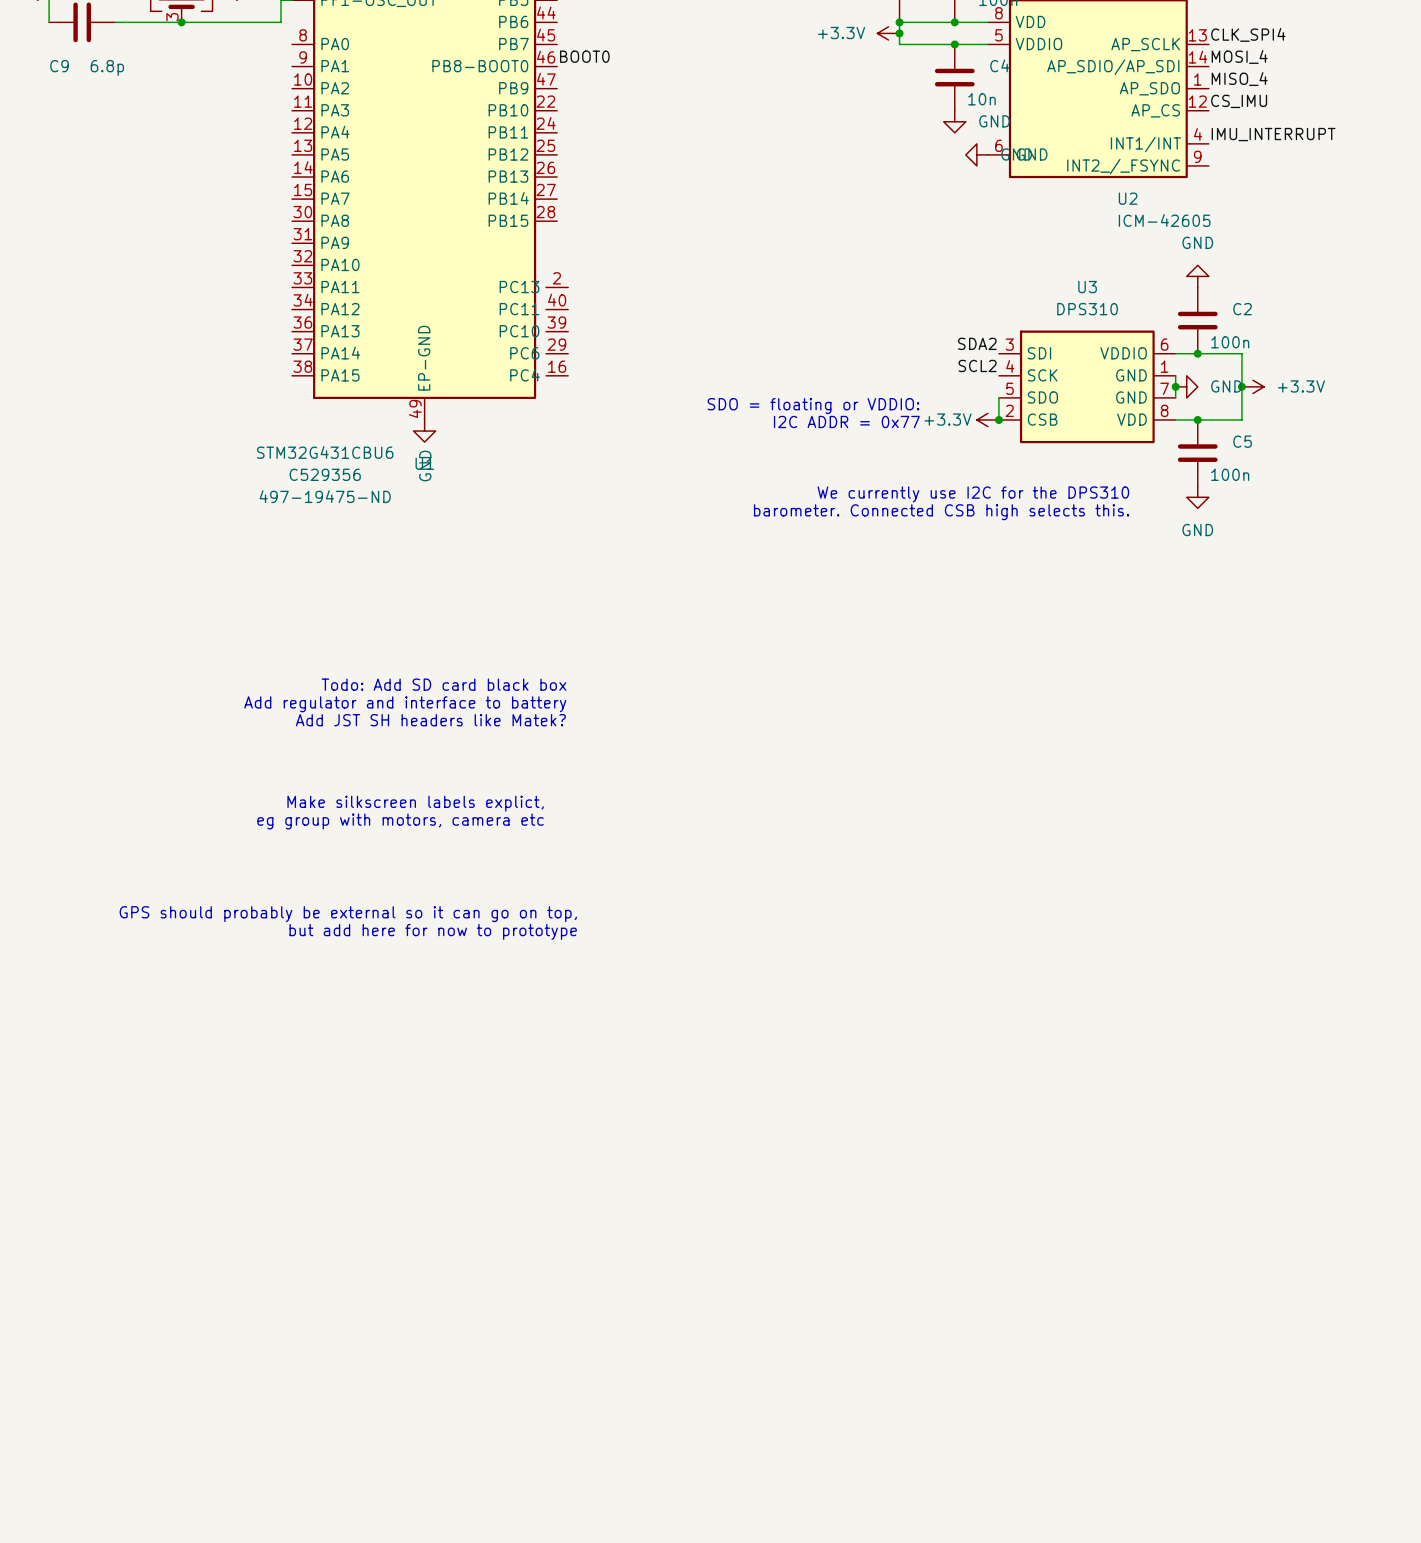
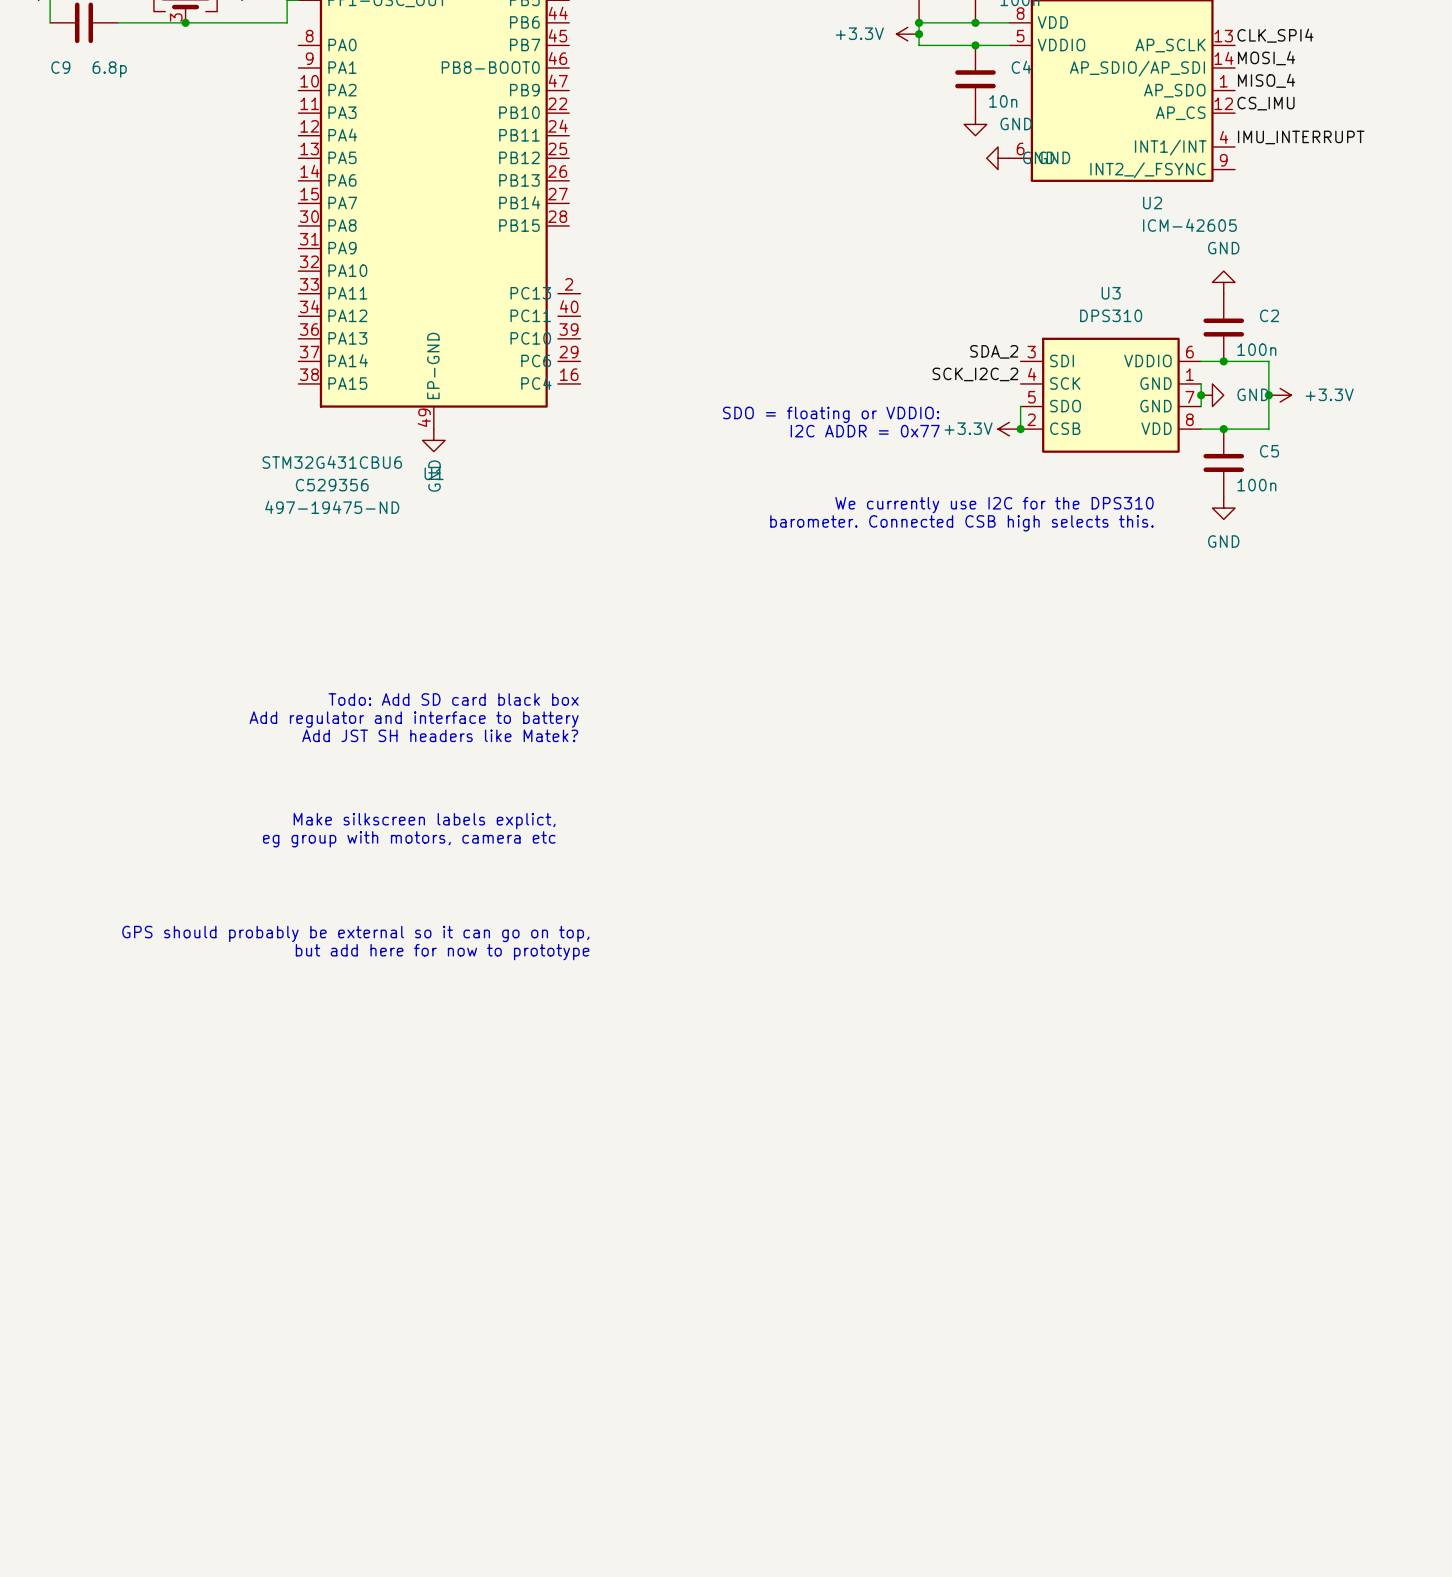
label: BOOT0 (584, 56) -> none
label: SDA2 (977, 343) -> SDA_2 (994, 351)
label: SCL2 (977, 365) -> SCK_I2C_2 (975, 374)

